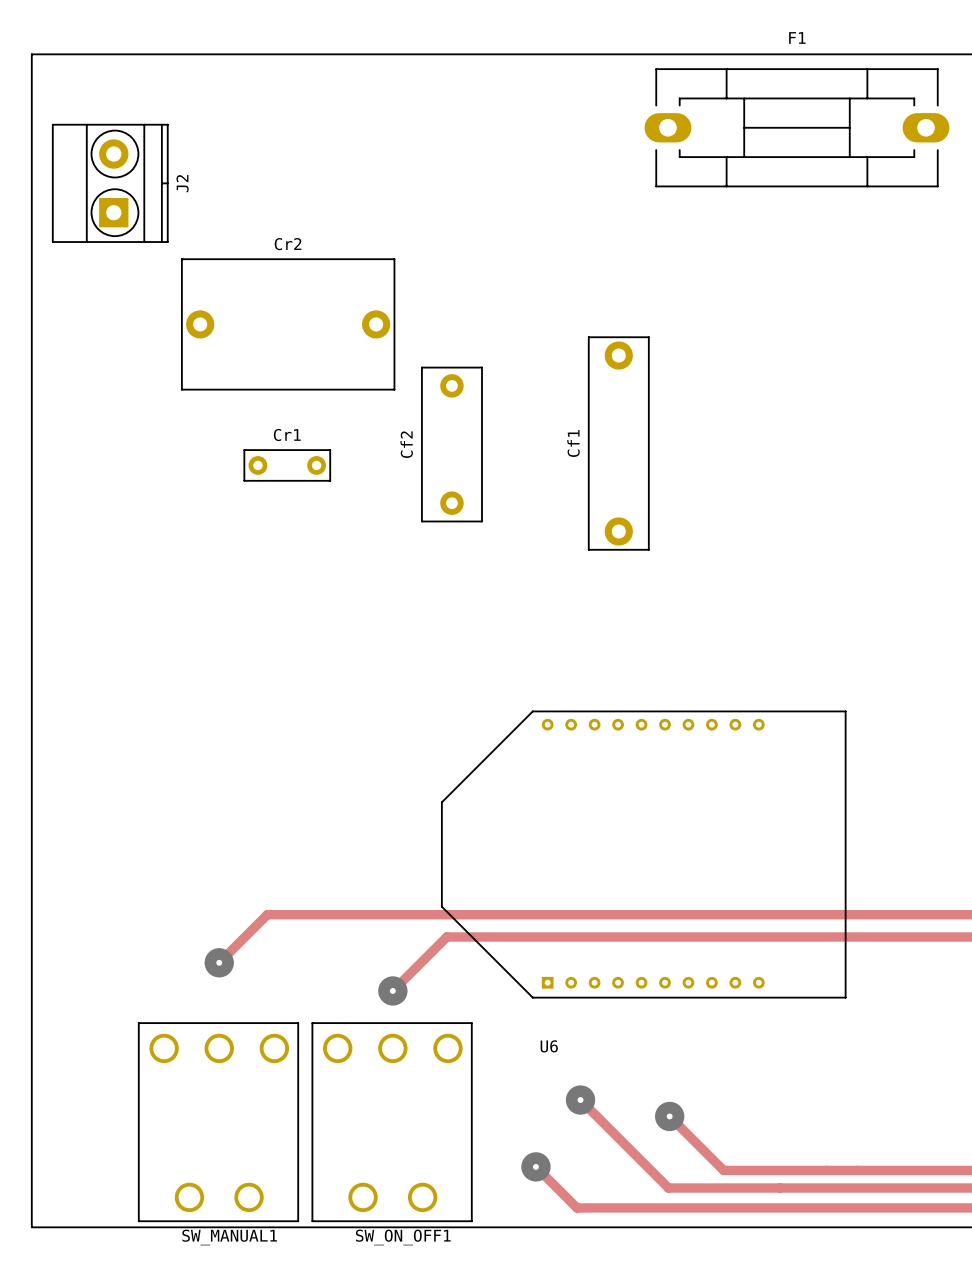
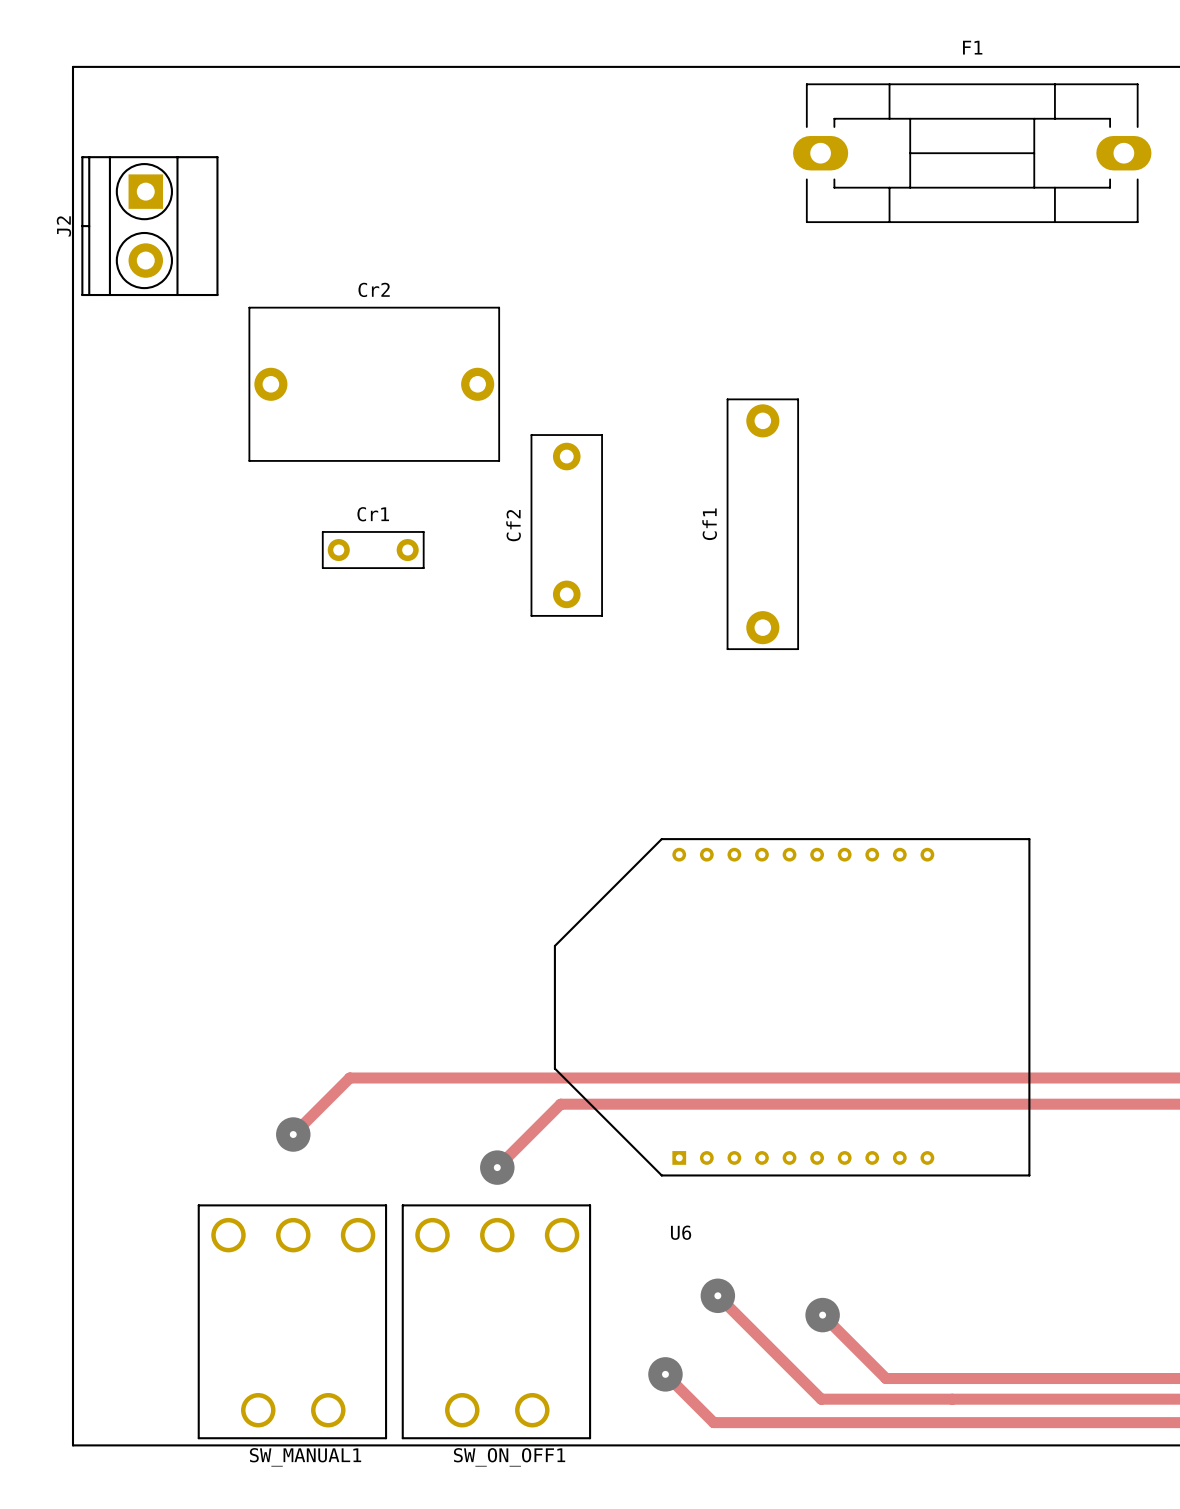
J2 rotation: 0° (110, 183) -> 180° (149, 226)

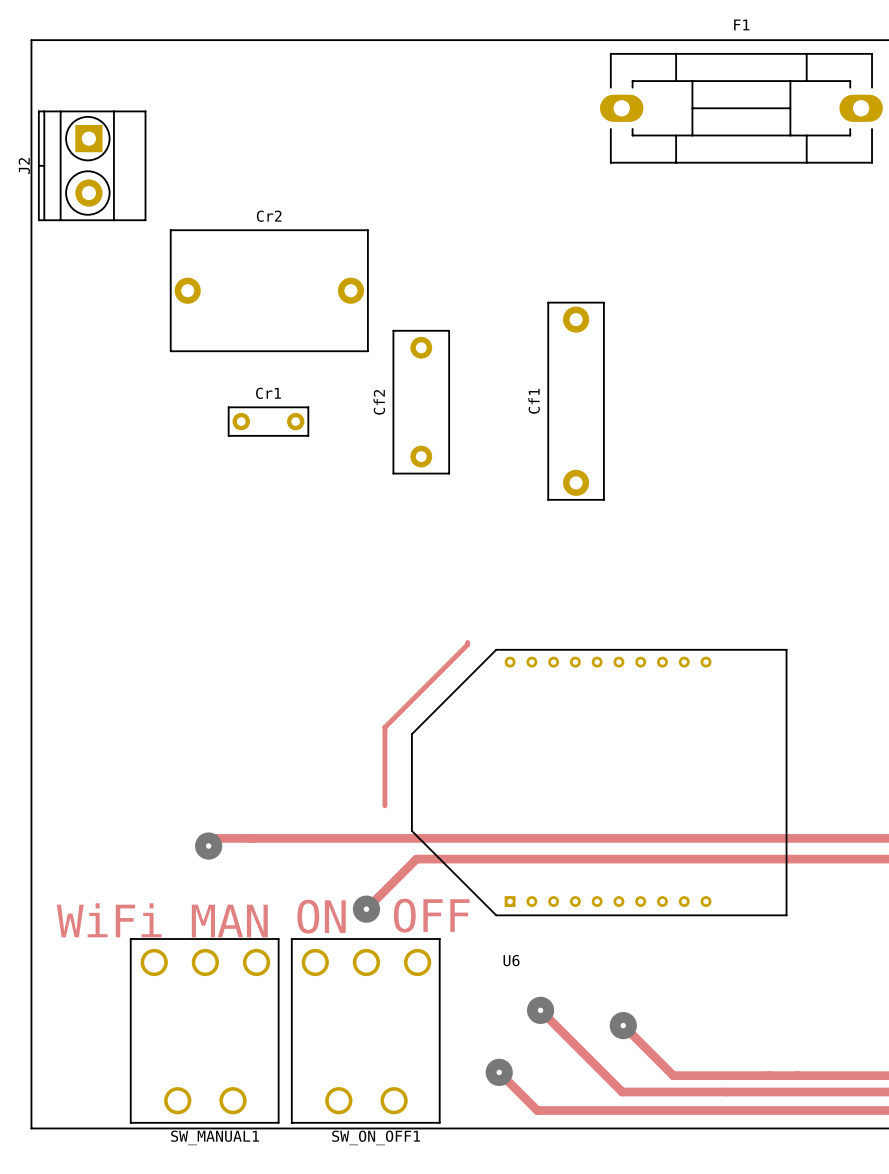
track: none -> (467, 642) (467, 644) (384, 727) (384, 805)
track: (349, 1078) (293, 1134) -> (249, 838) (216, 838) (208, 846)
via position: (293, 1134) -> (208, 846)
text: none -> OFF (431, 915)
text: none -> ON (321, 916)
text: none -> WiFi (109, 920)
text: none -> MAN (229, 920)

